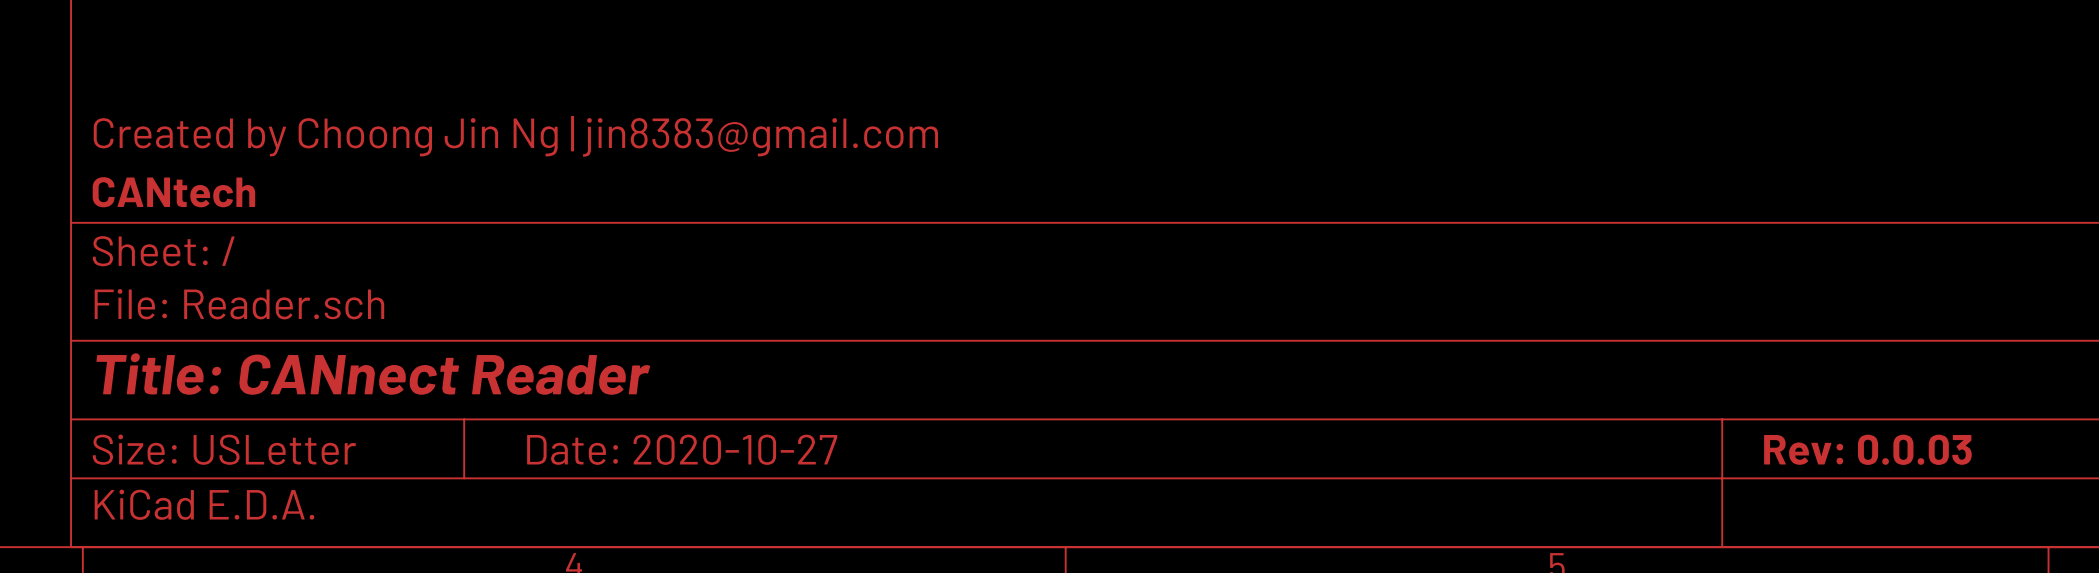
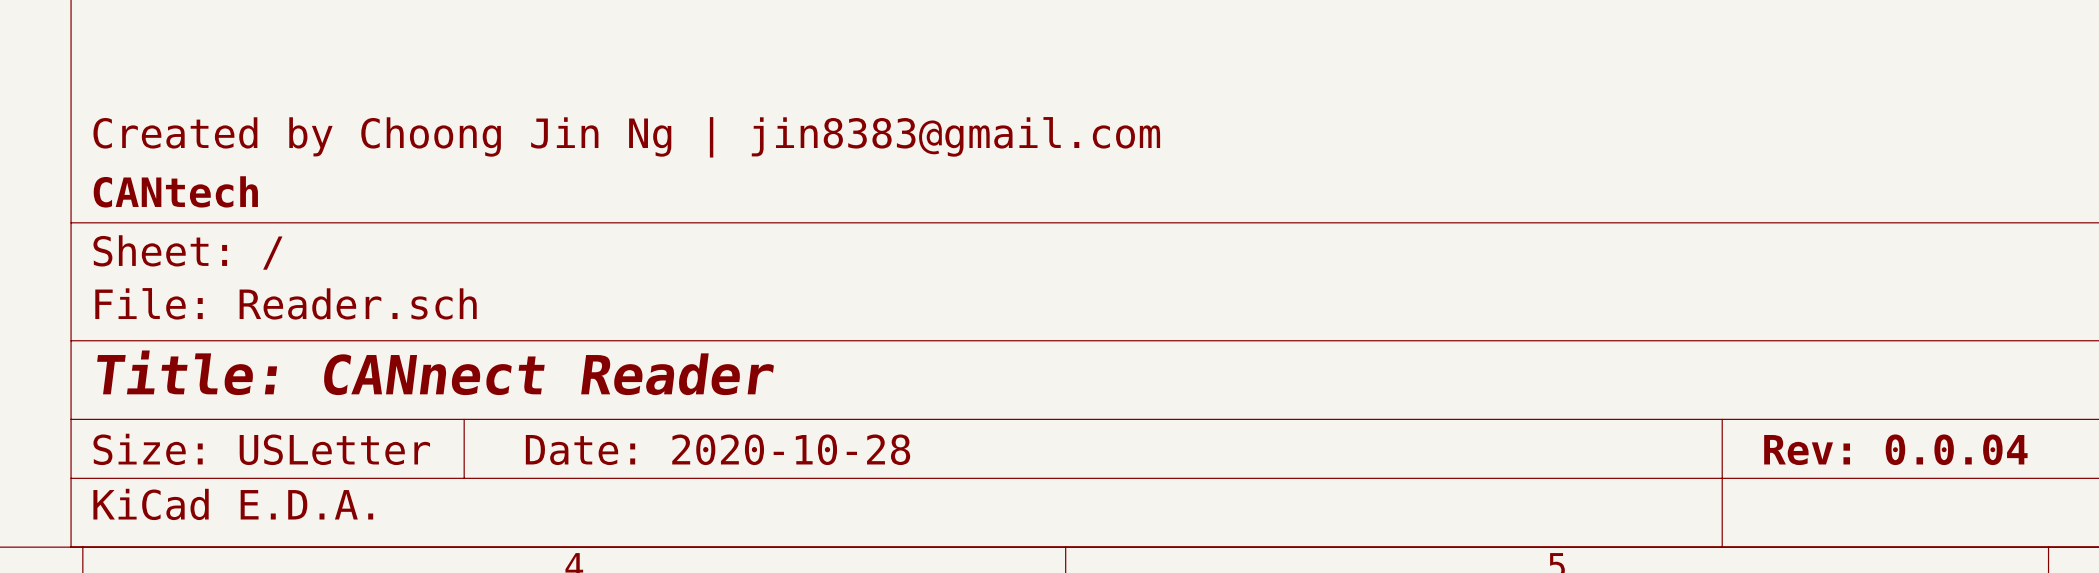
title block: Date: 2020-10-27 (682, 449) -> Date: 2020-10-28 (718, 449)
title block: Rev: 0.0.03 (1867, 449) -> Rev: 0.0.04 (1895, 449)

